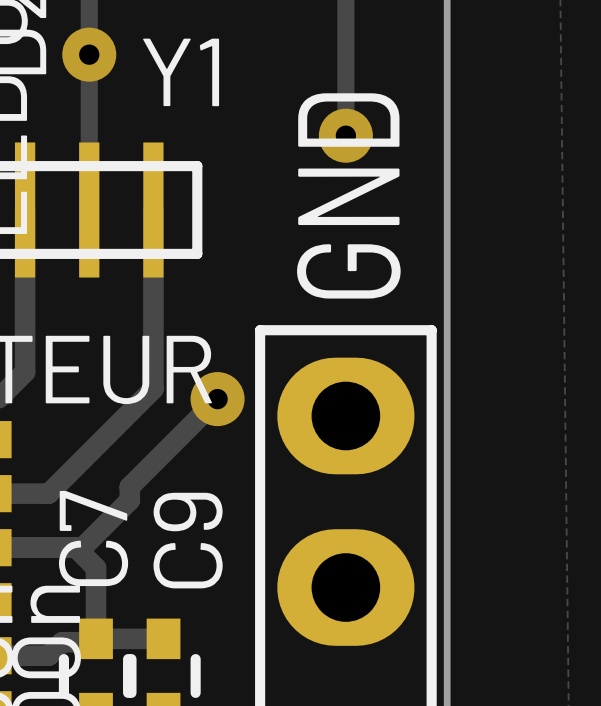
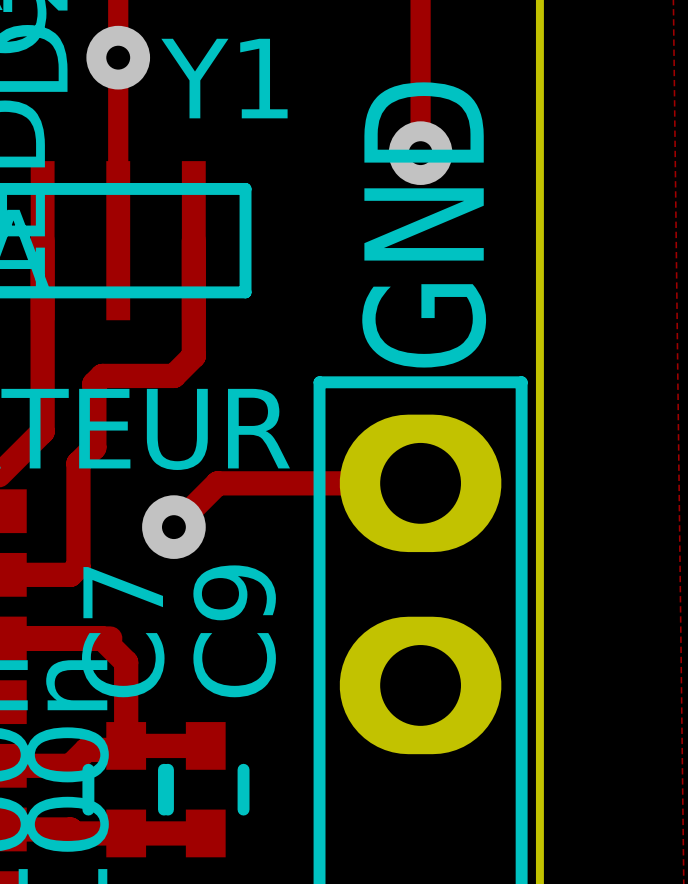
track: (153, 307) (153, 388) (55, 486) -> (193, 356) (173, 375) (102, 375) (94, 383) (94, 447) (78, 463) (78, 566)
track: (217, 399) (129, 486) (129, 500) (82, 547) -> none
via position: (217, 399) -> (173, 527)
track: none -> (420, 483) (217, 483) (173, 527)

